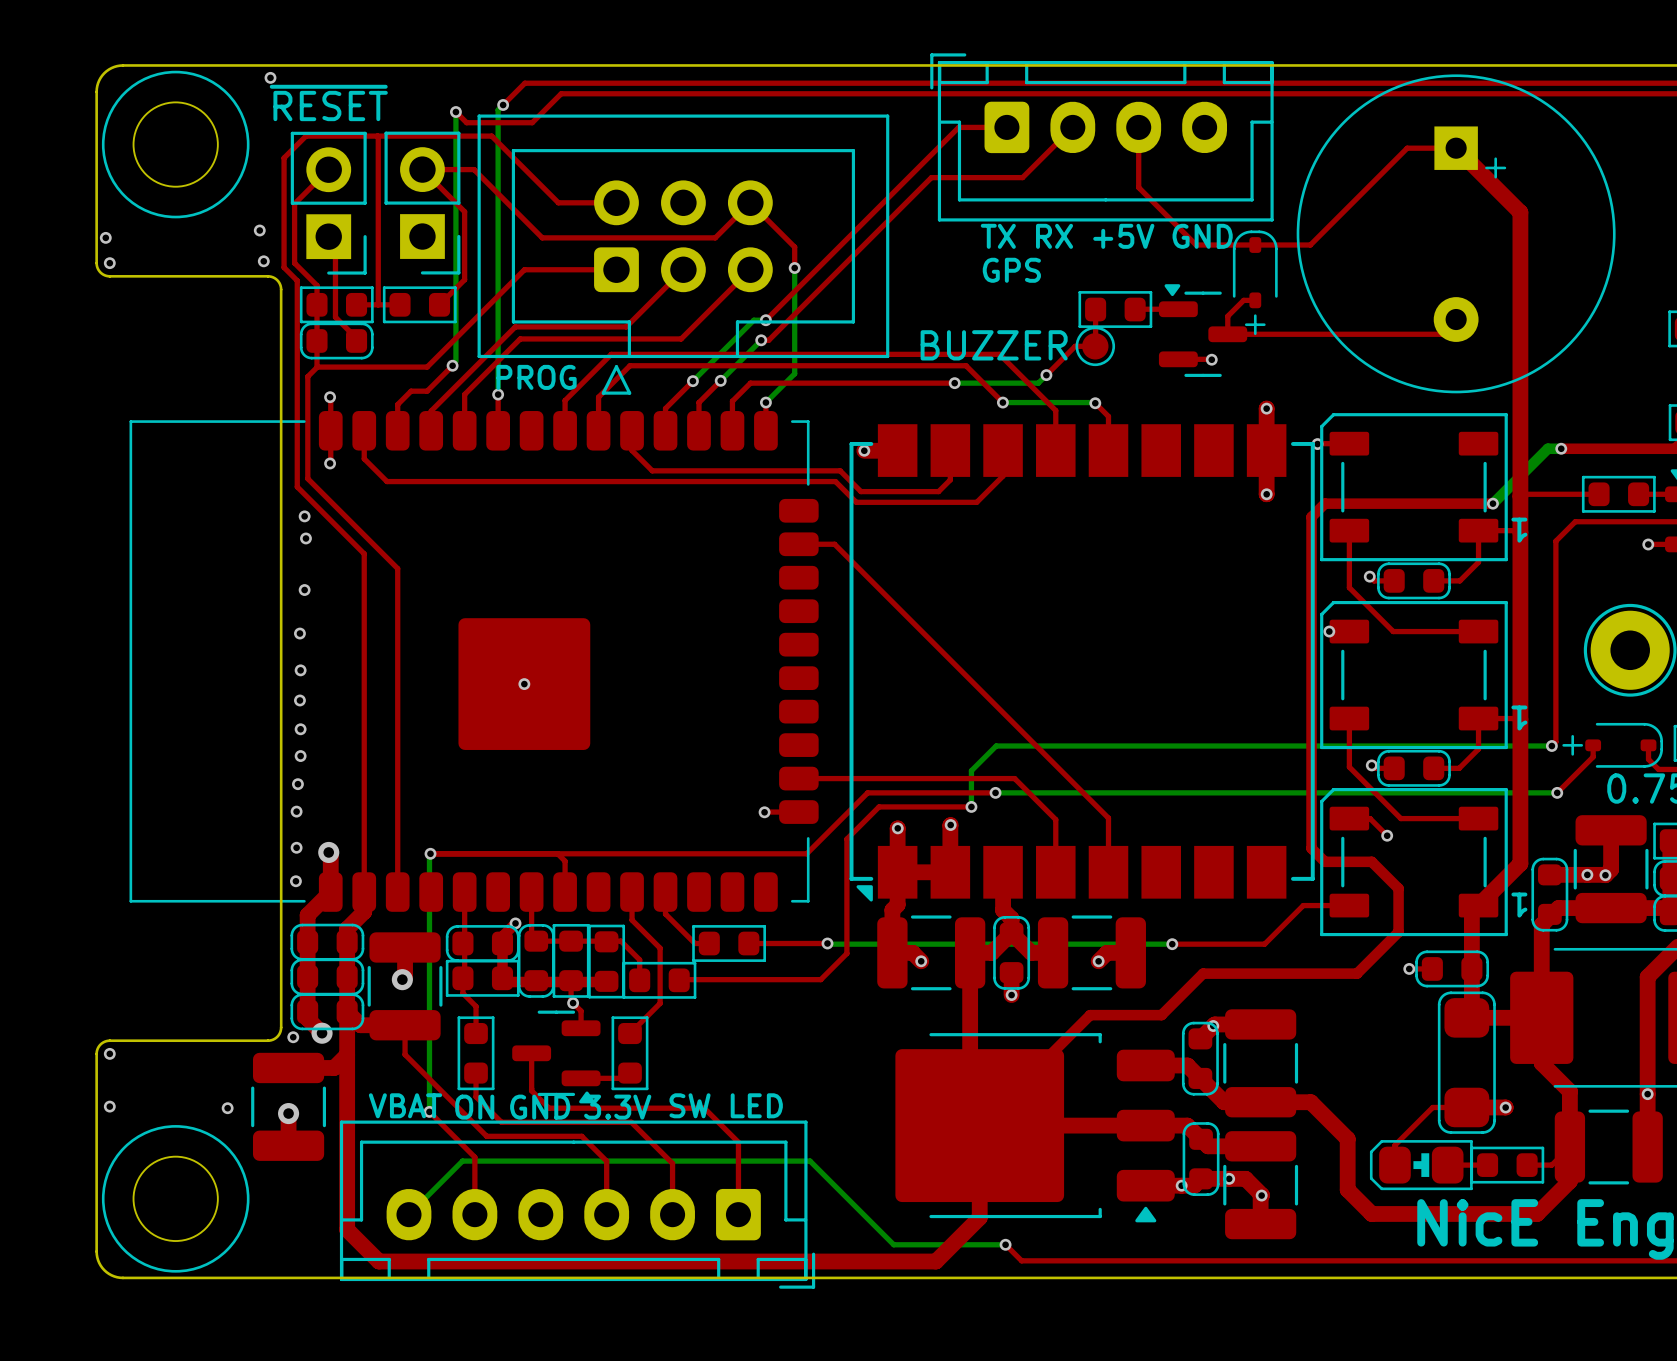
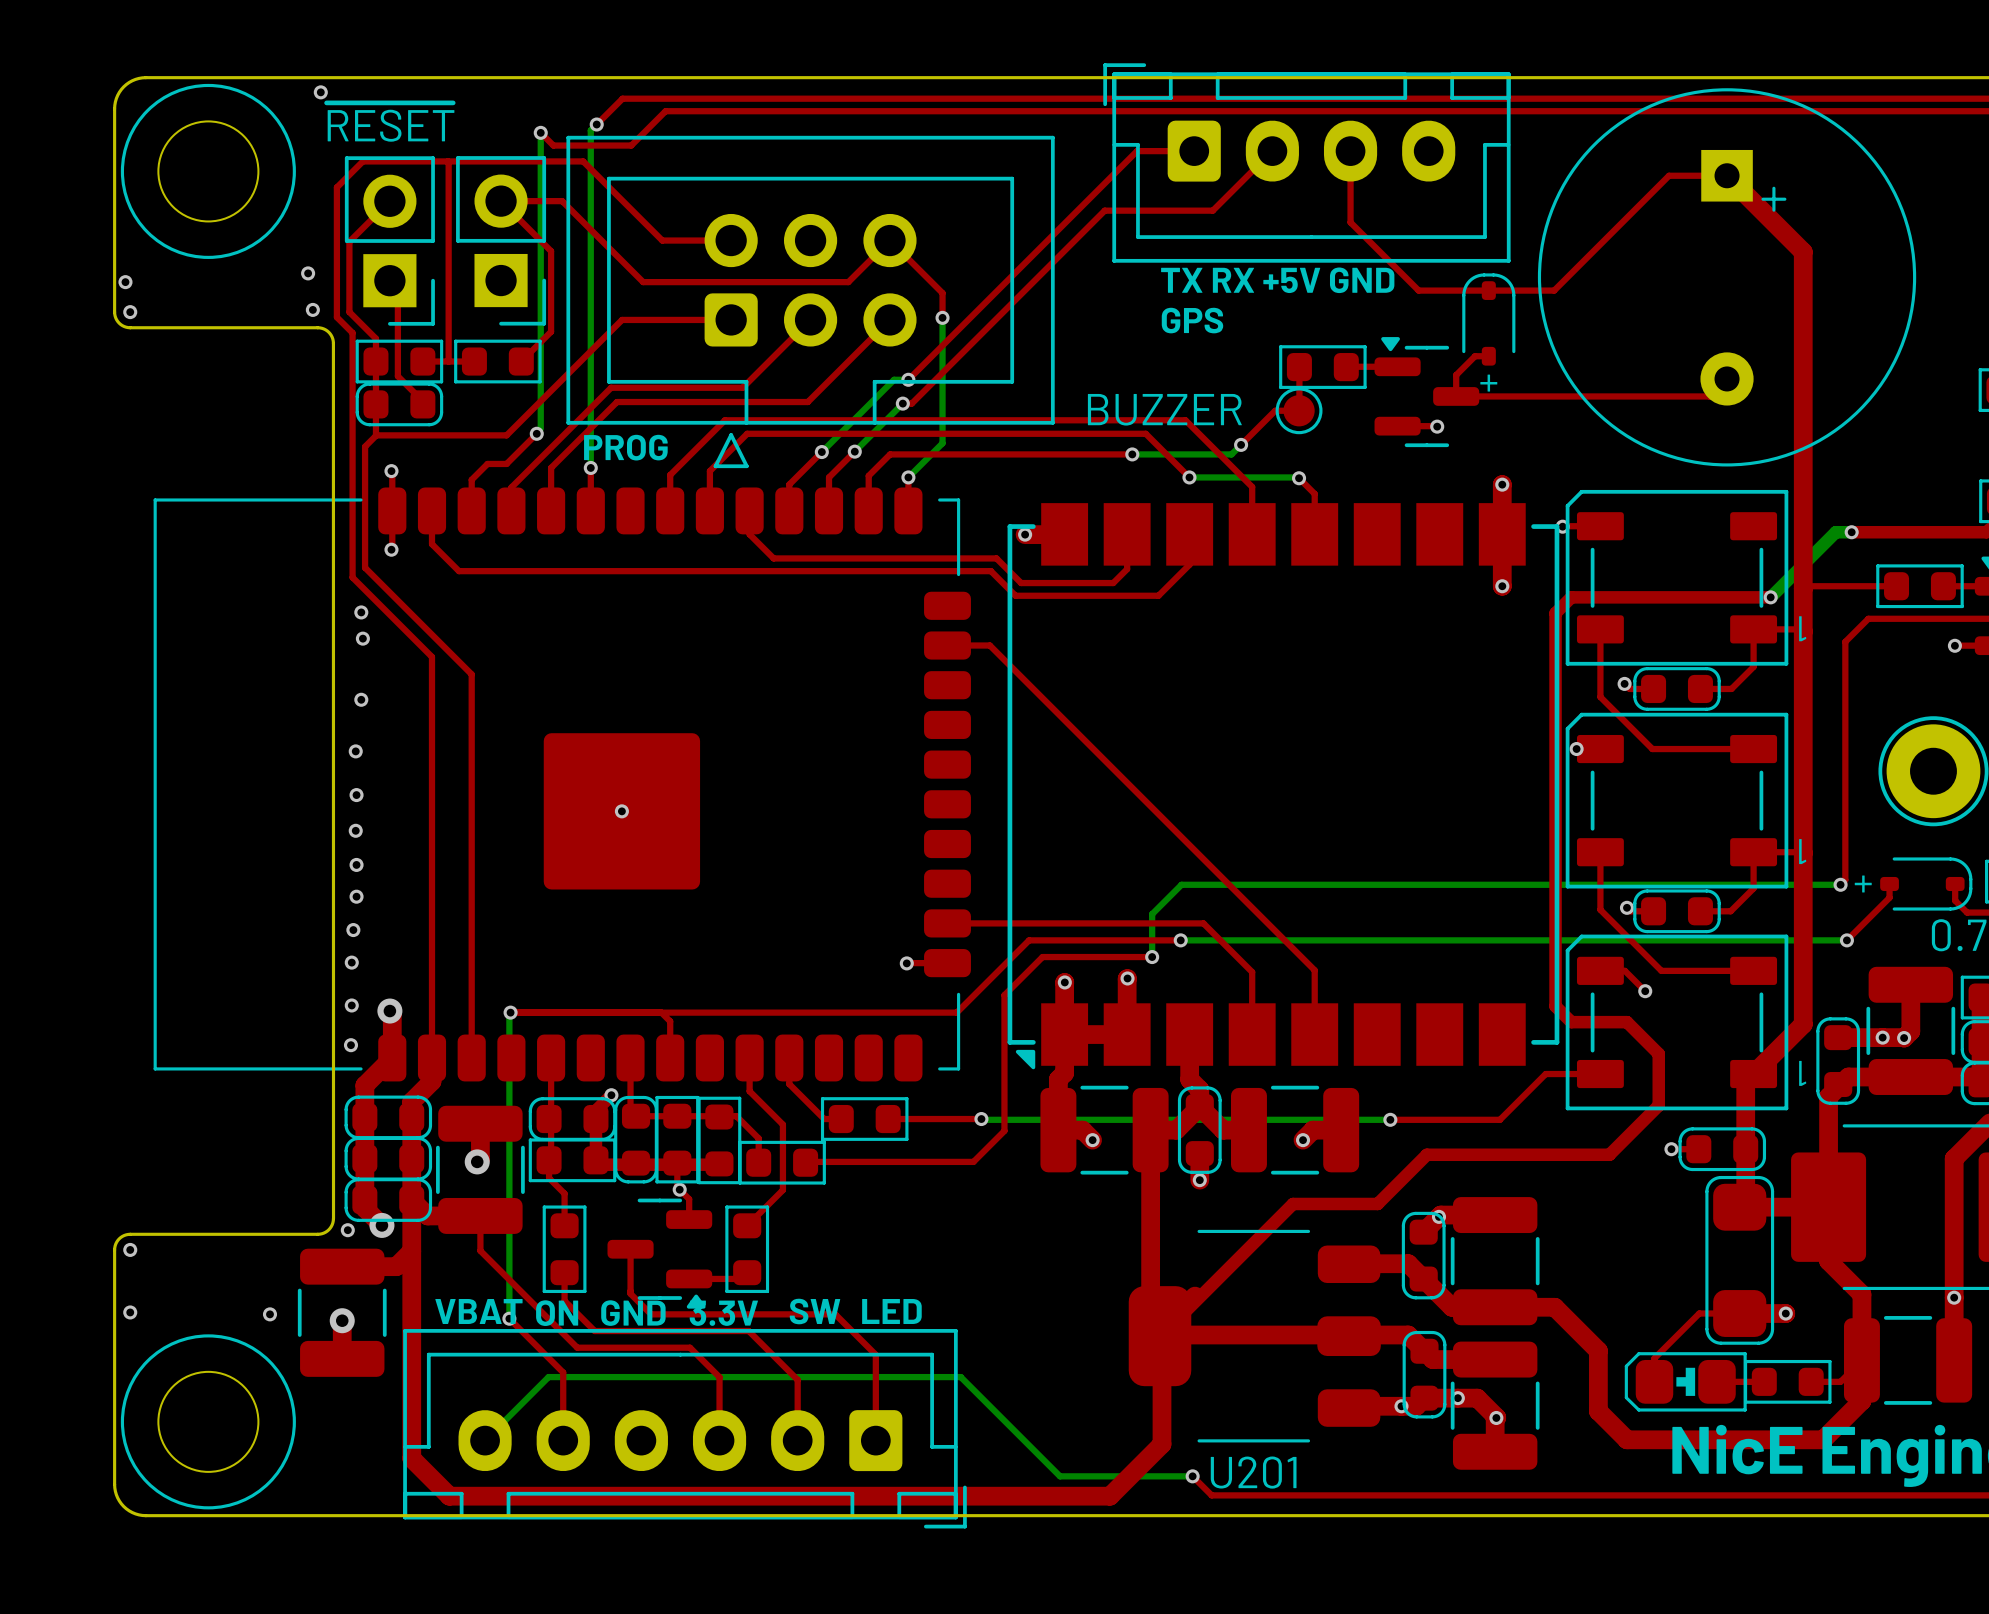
U201: none -> (1254, 1336)
part: (1035, 1127) -> none

